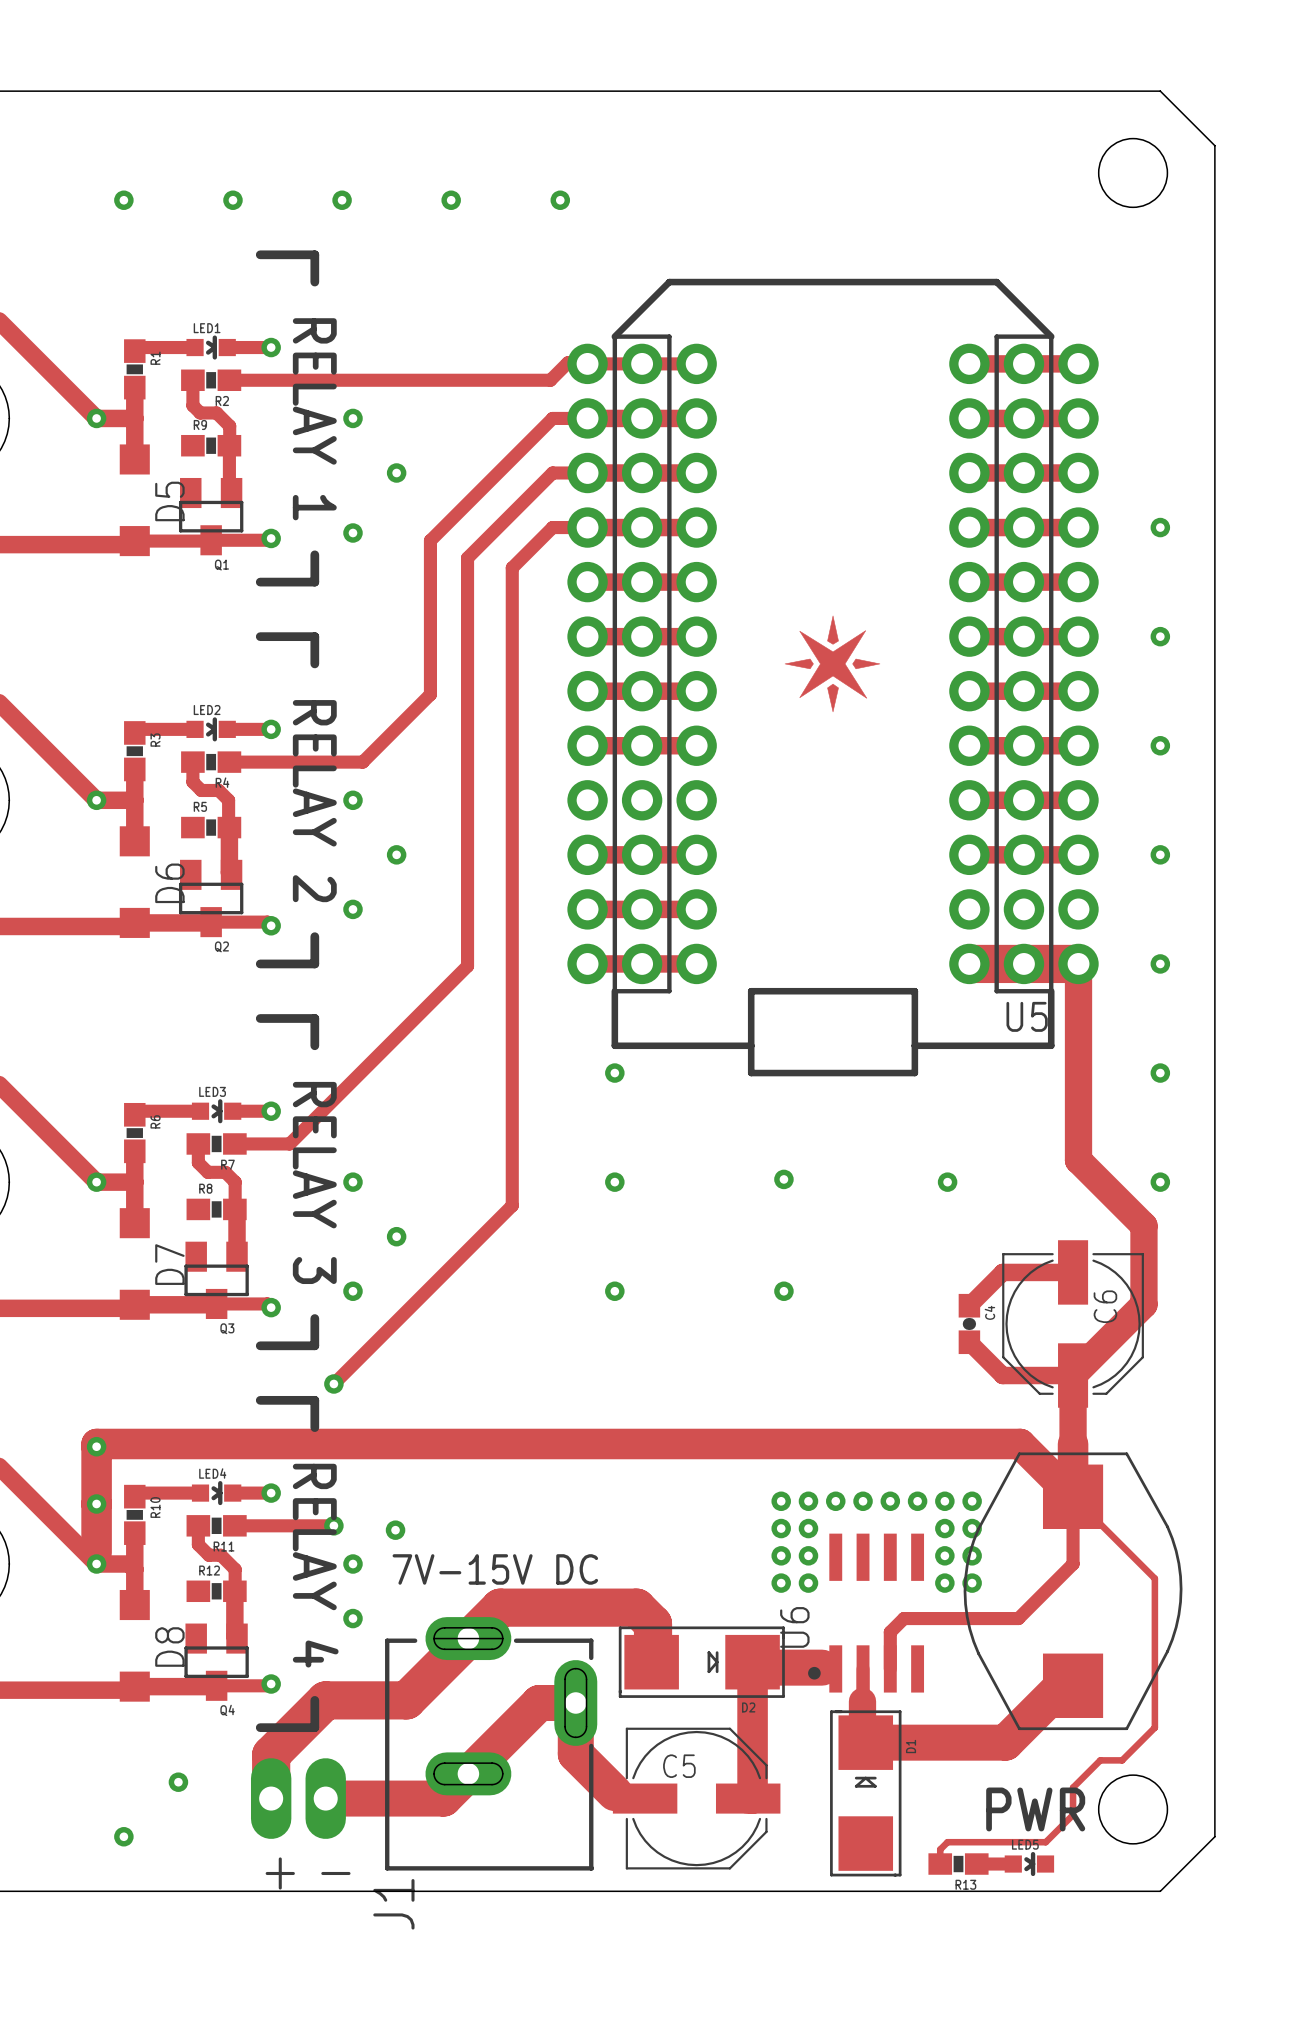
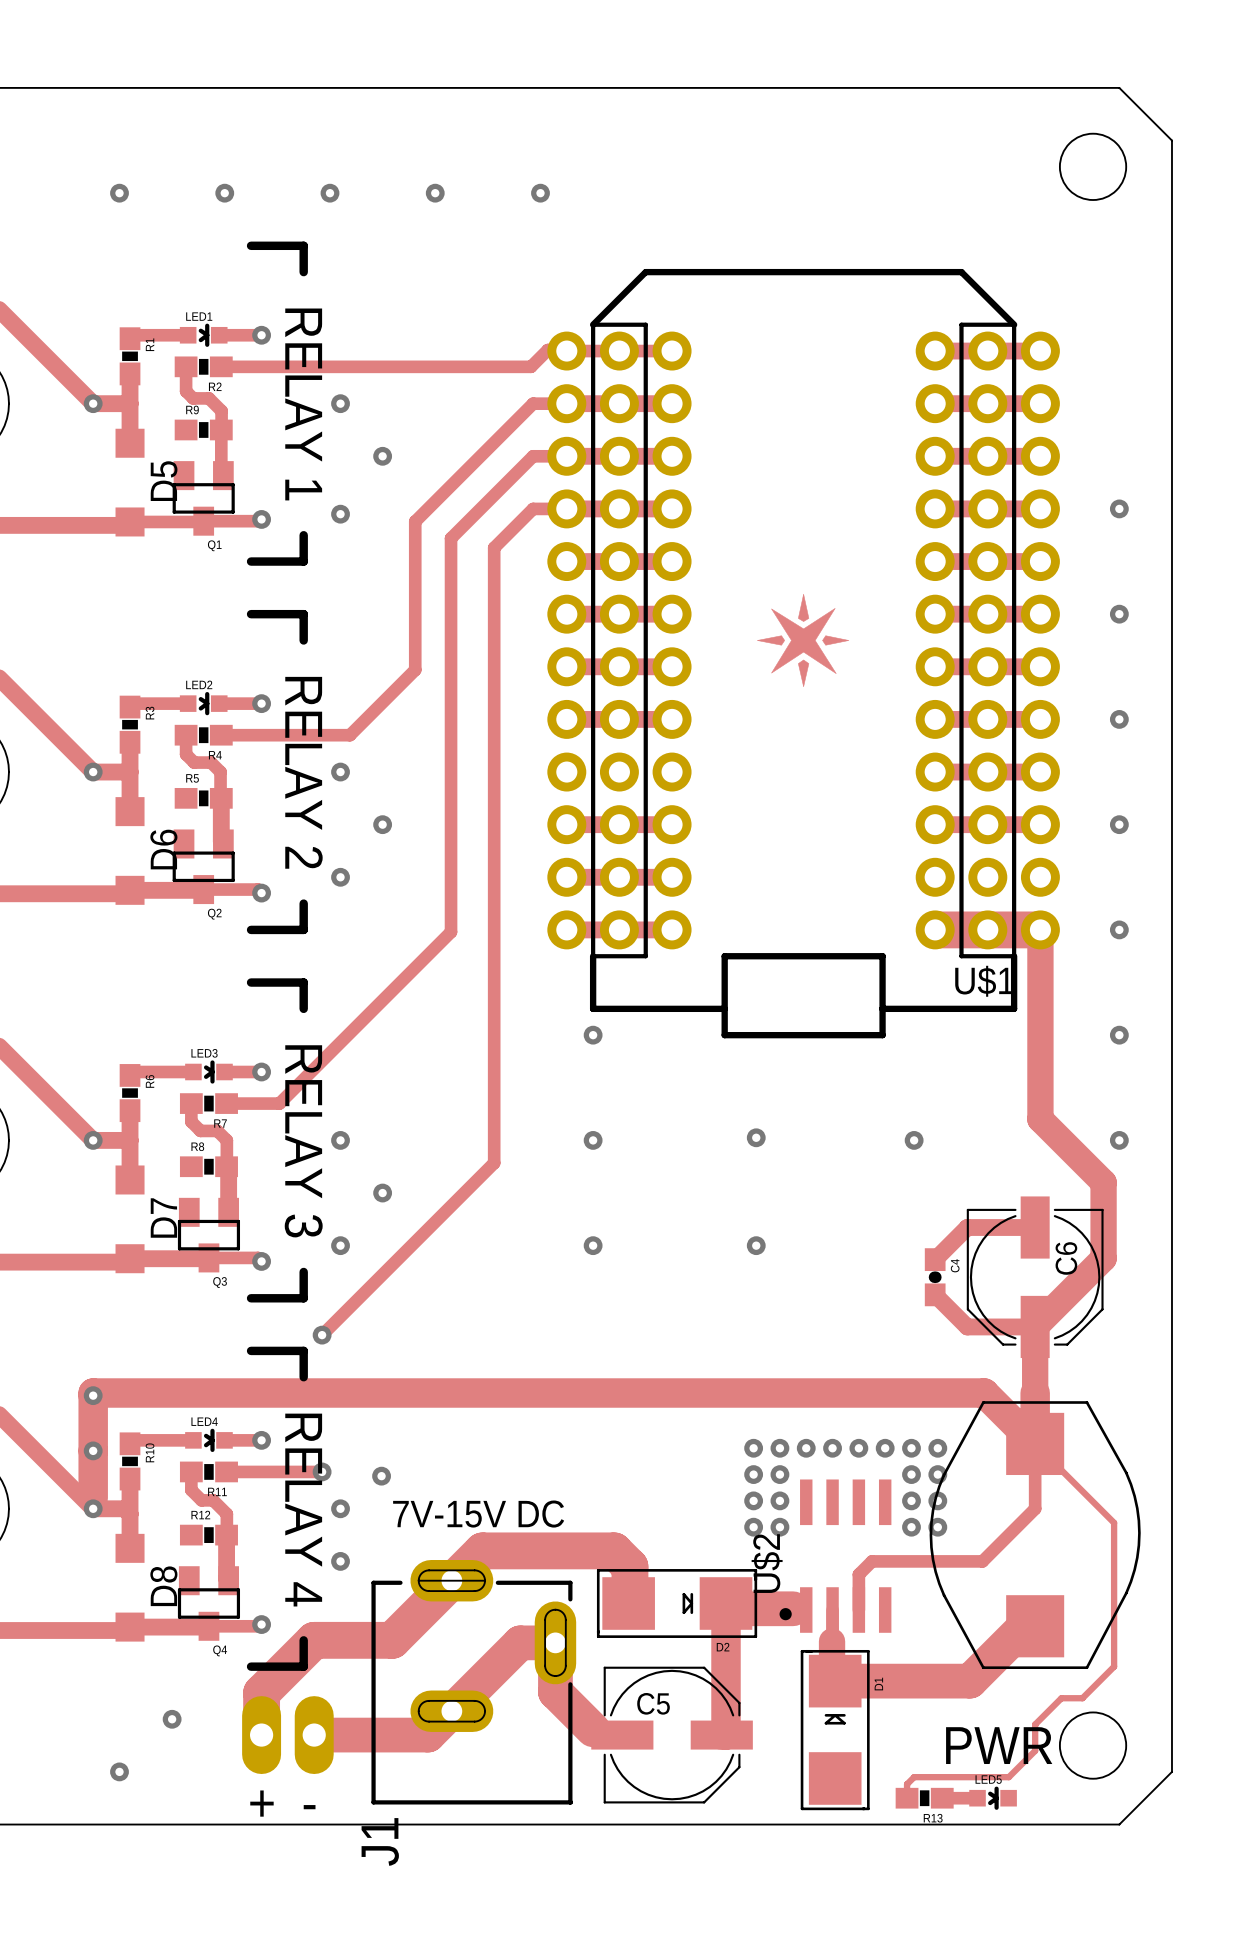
U5 name: U5 (1027, 1016) -> U$1 (984, 981)
U6 name: U6 (794, 1627) -> U$2 (767, 1563)

